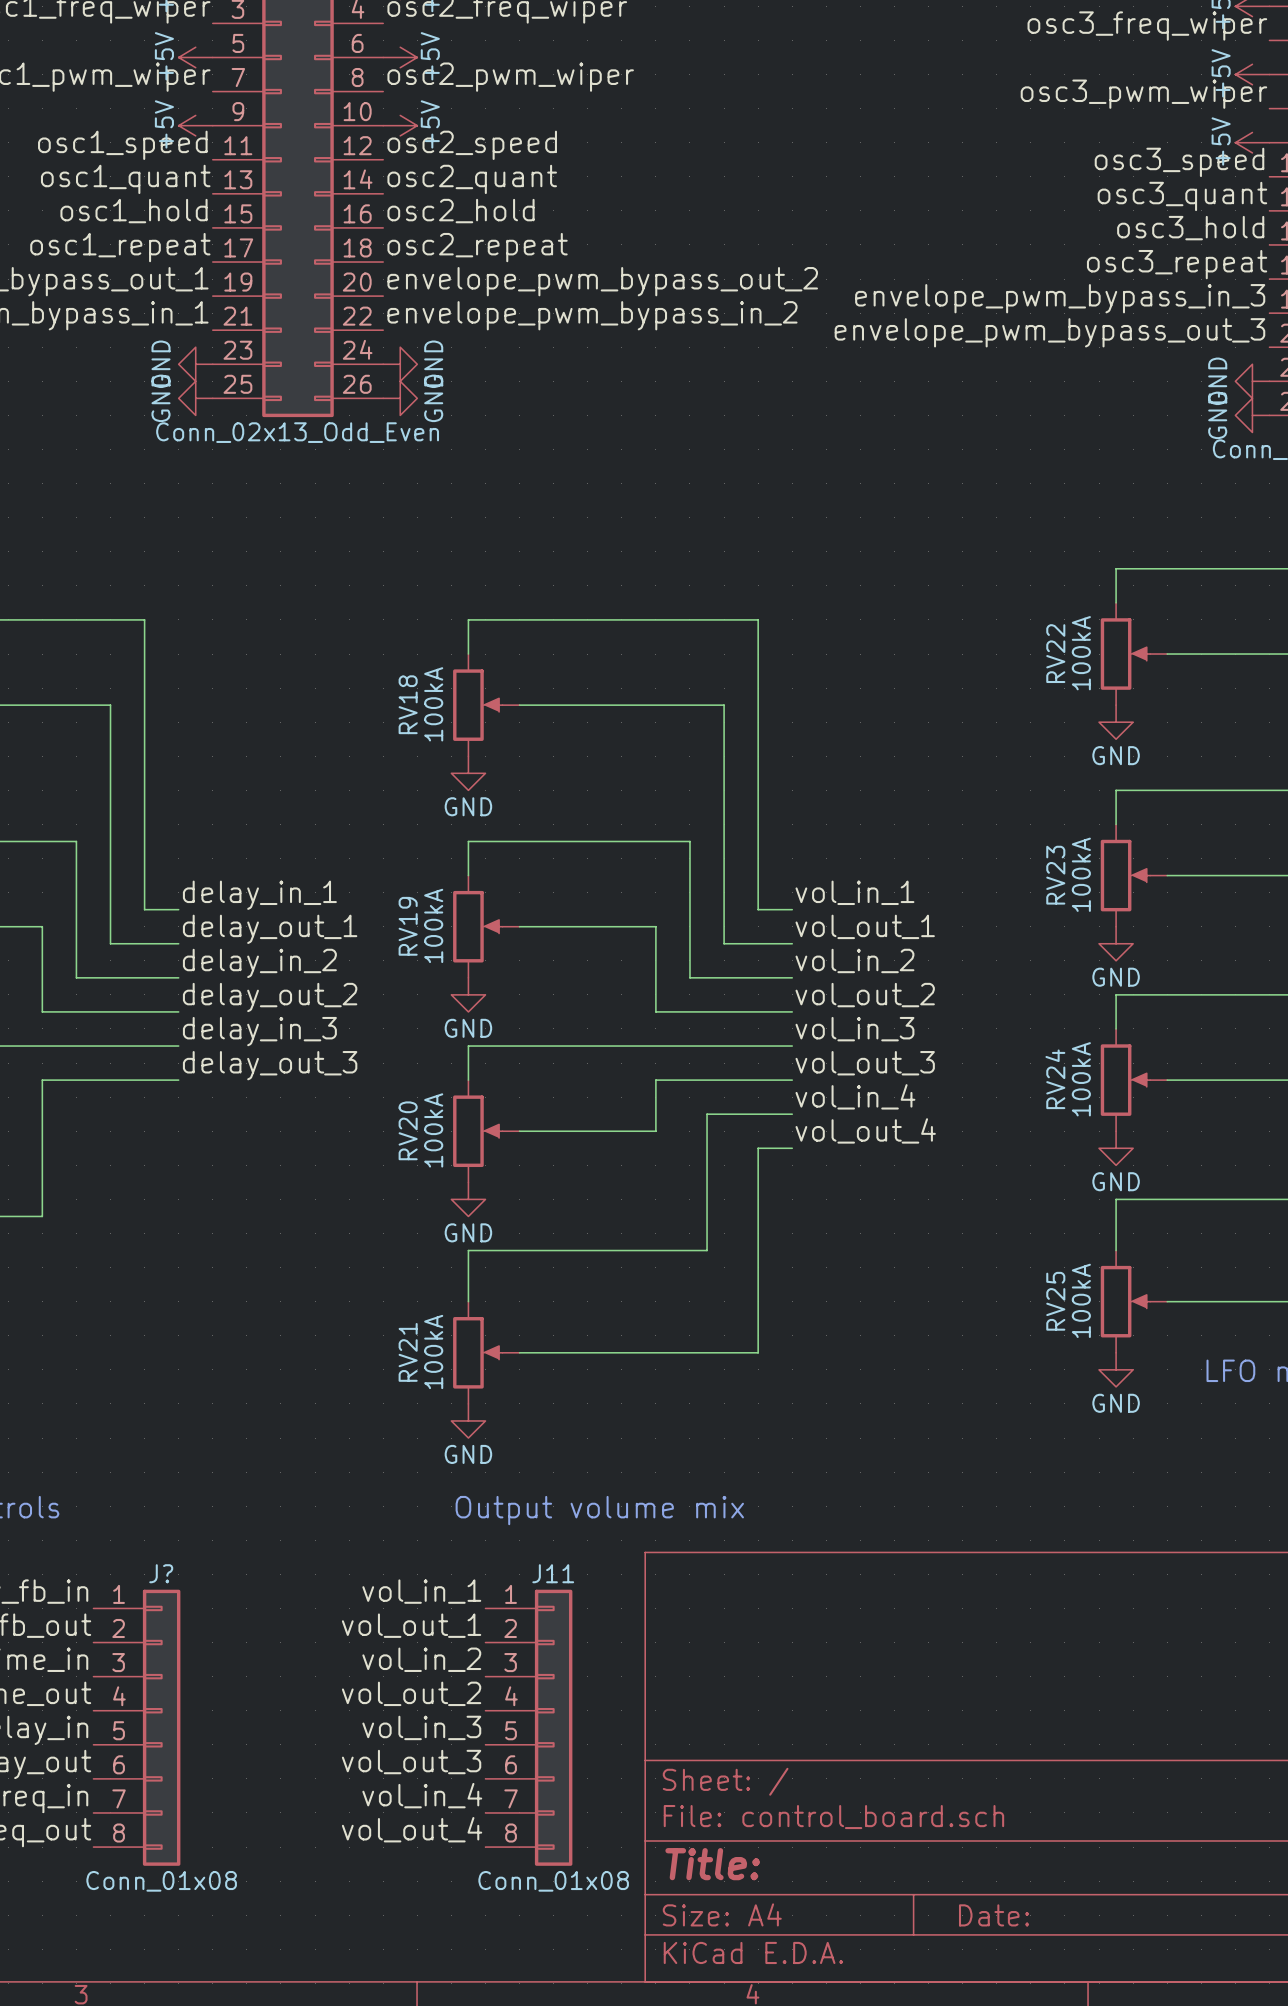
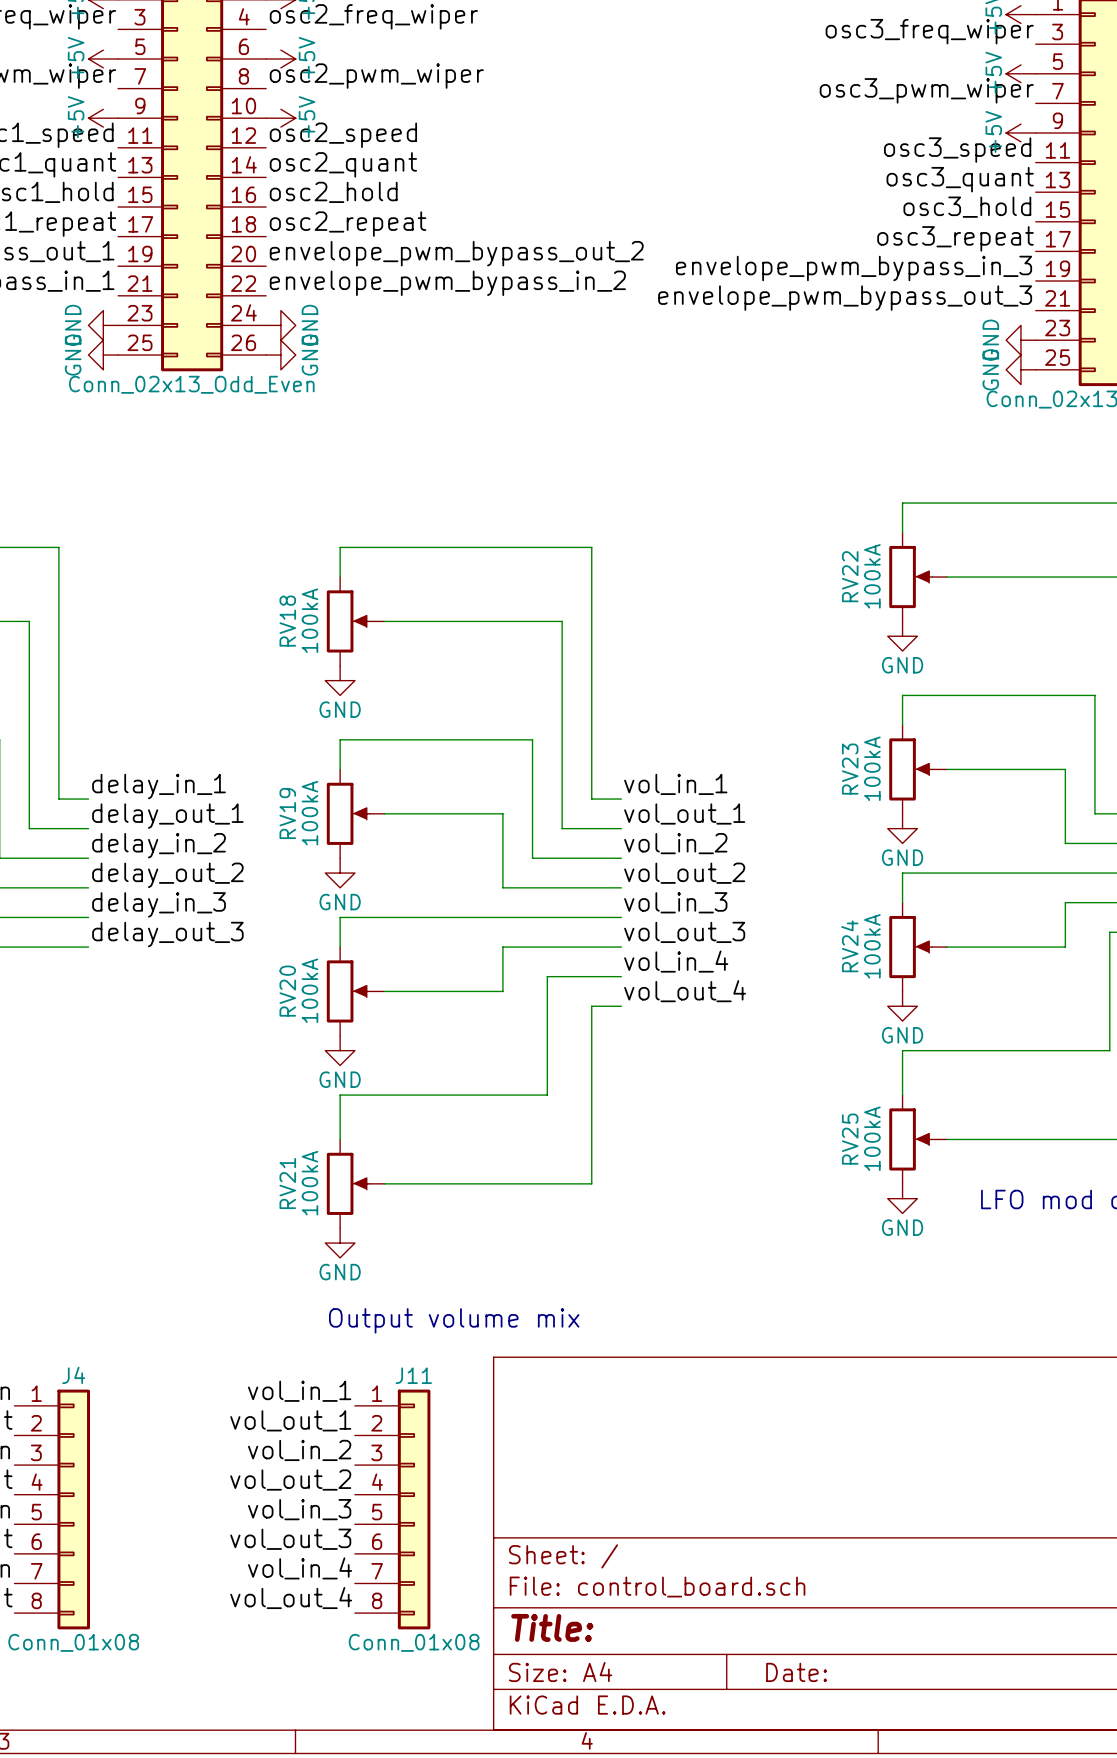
J? name: J? (161, 1573) -> J4 (73, 1375)

